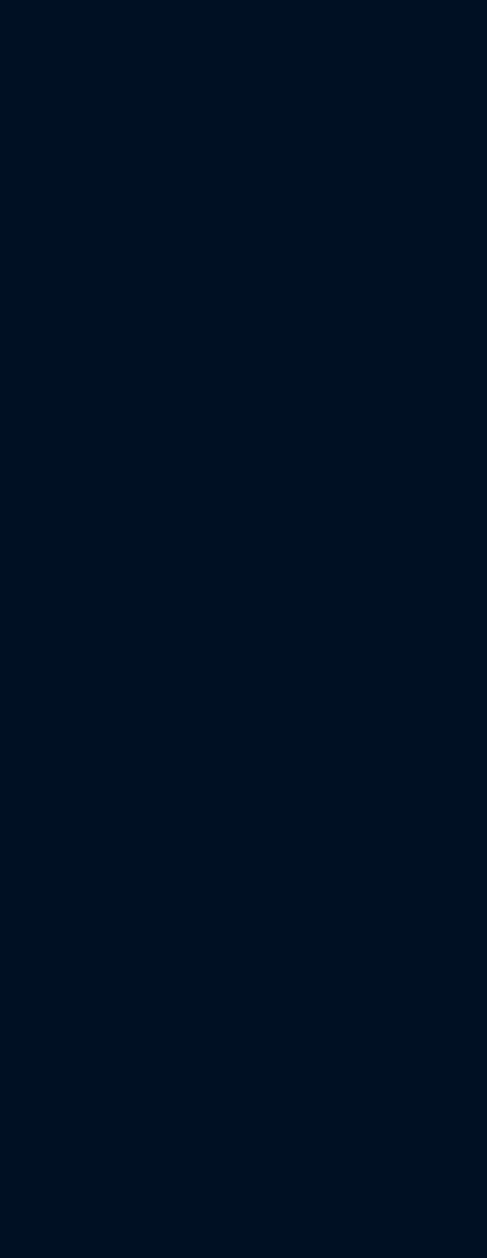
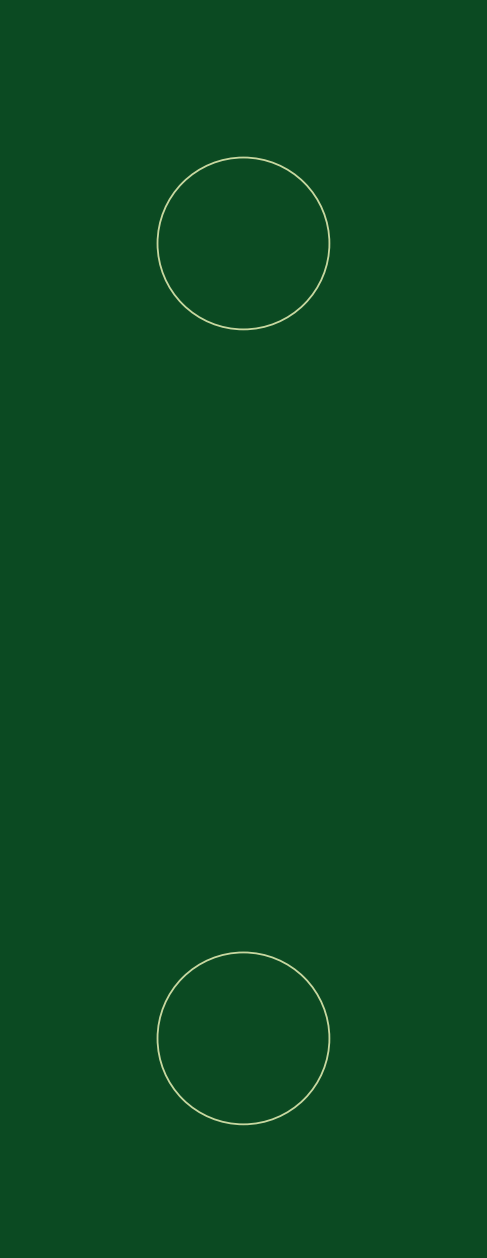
part: none -> (243, 243)
part: none -> (243, 1038)

